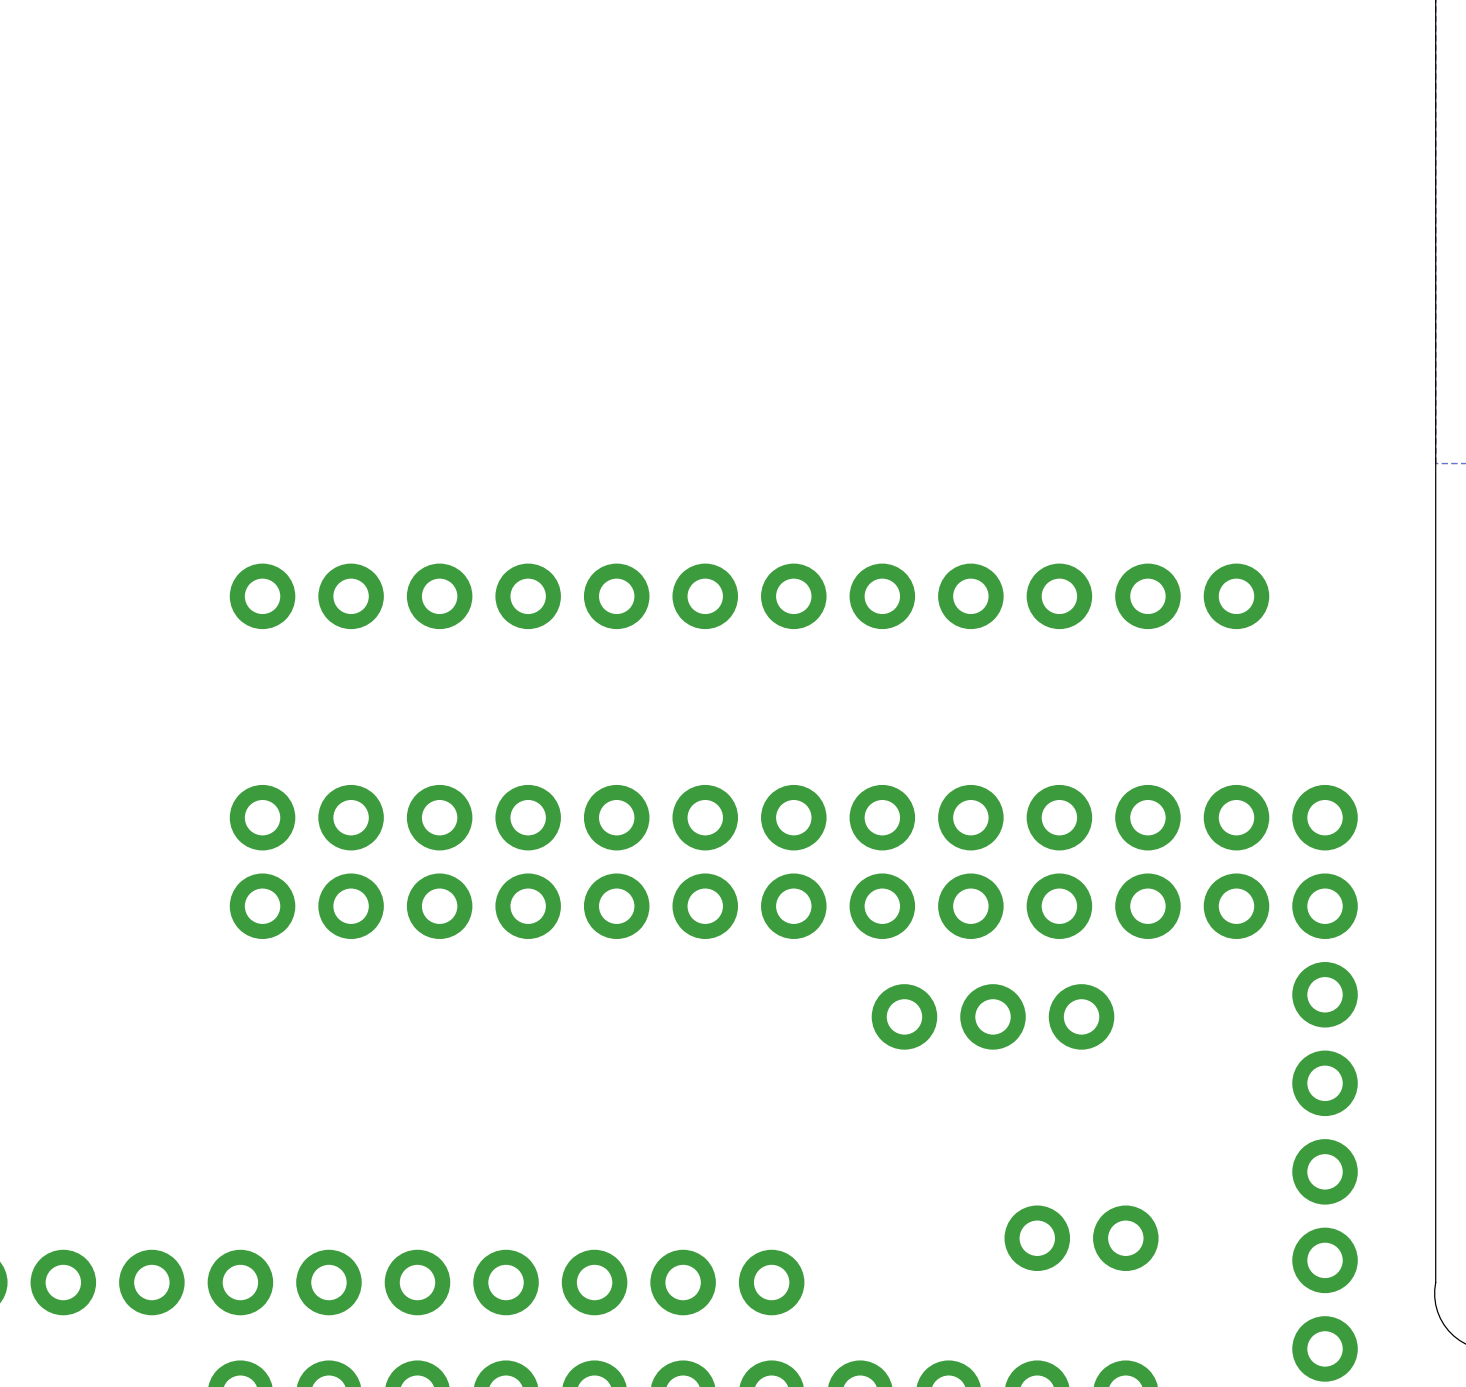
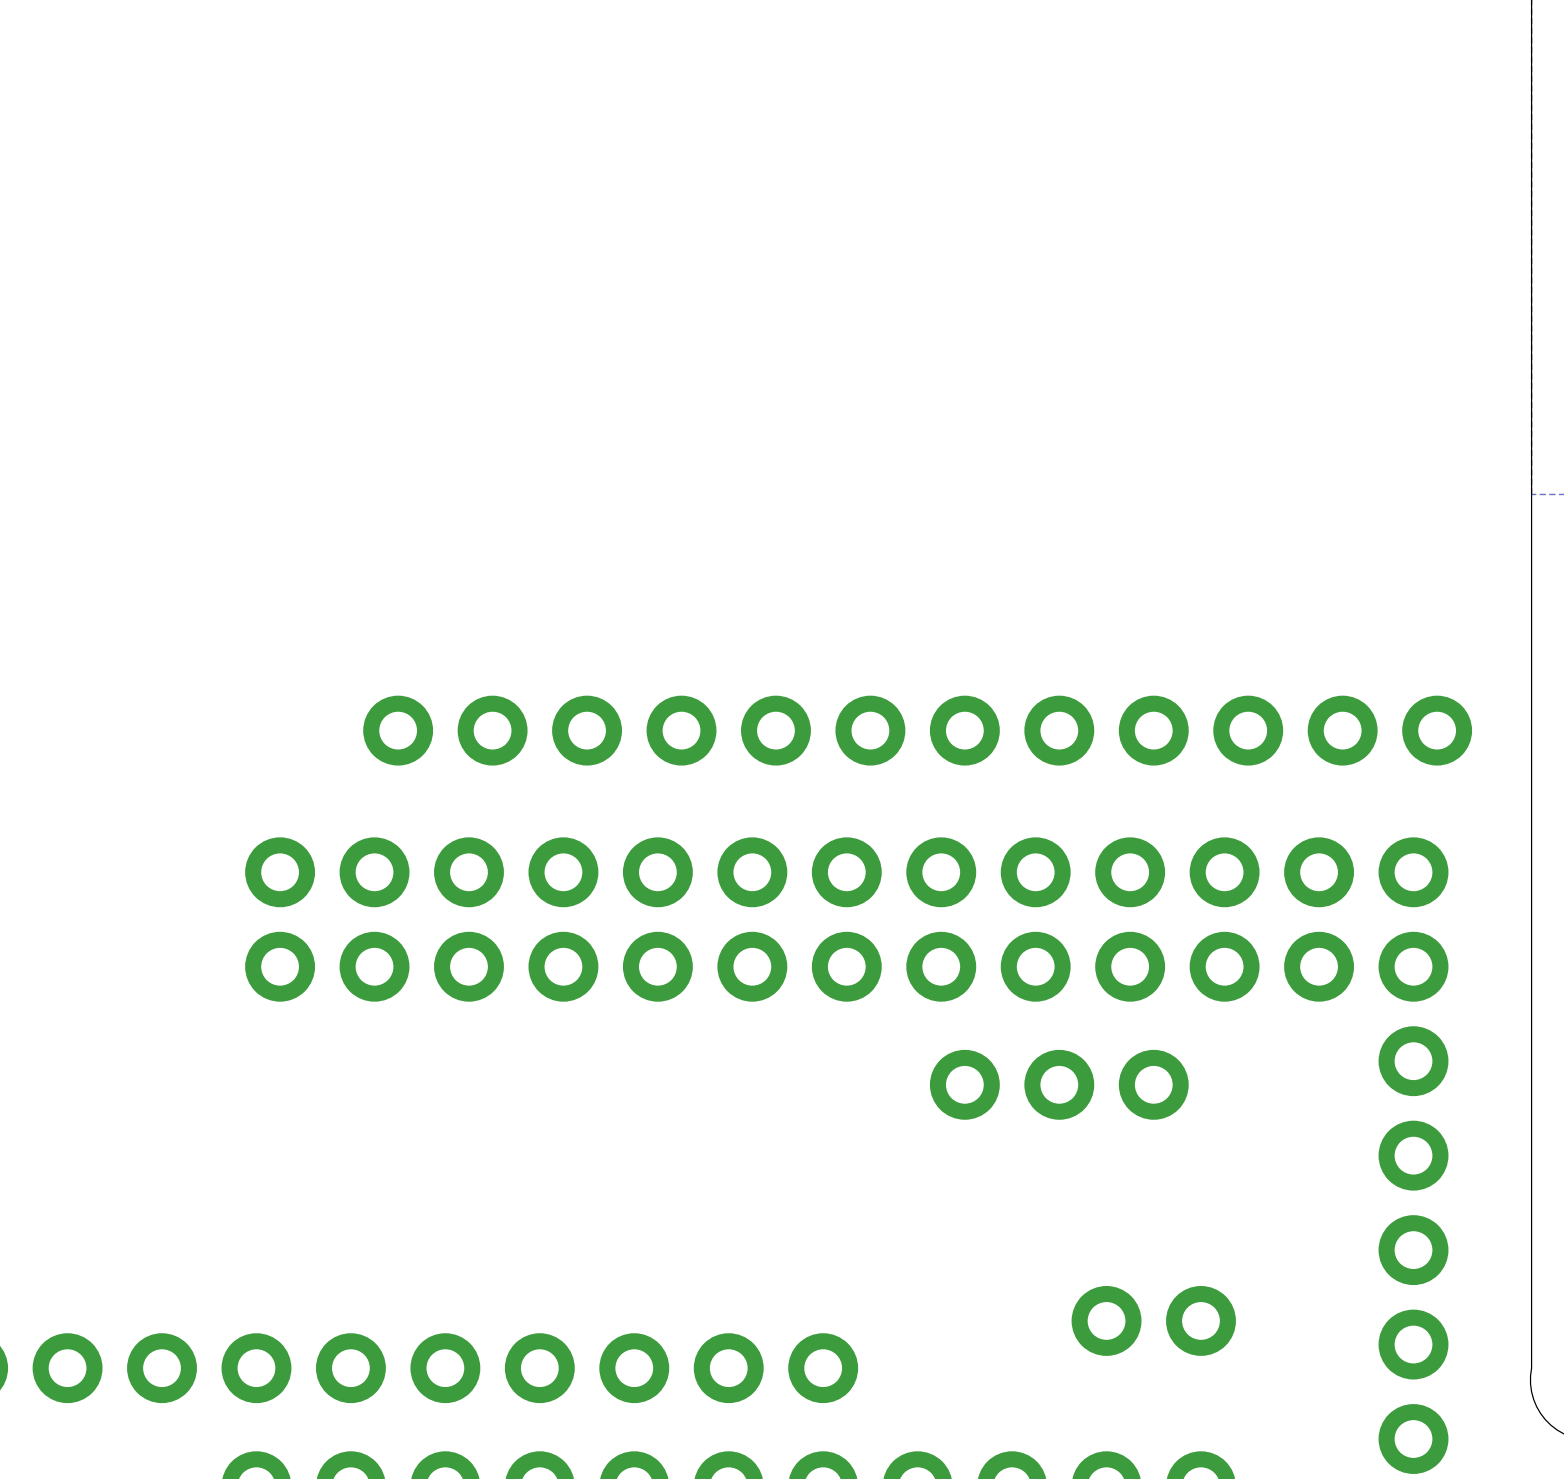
part position: (749, 596) -> (917, 730)

